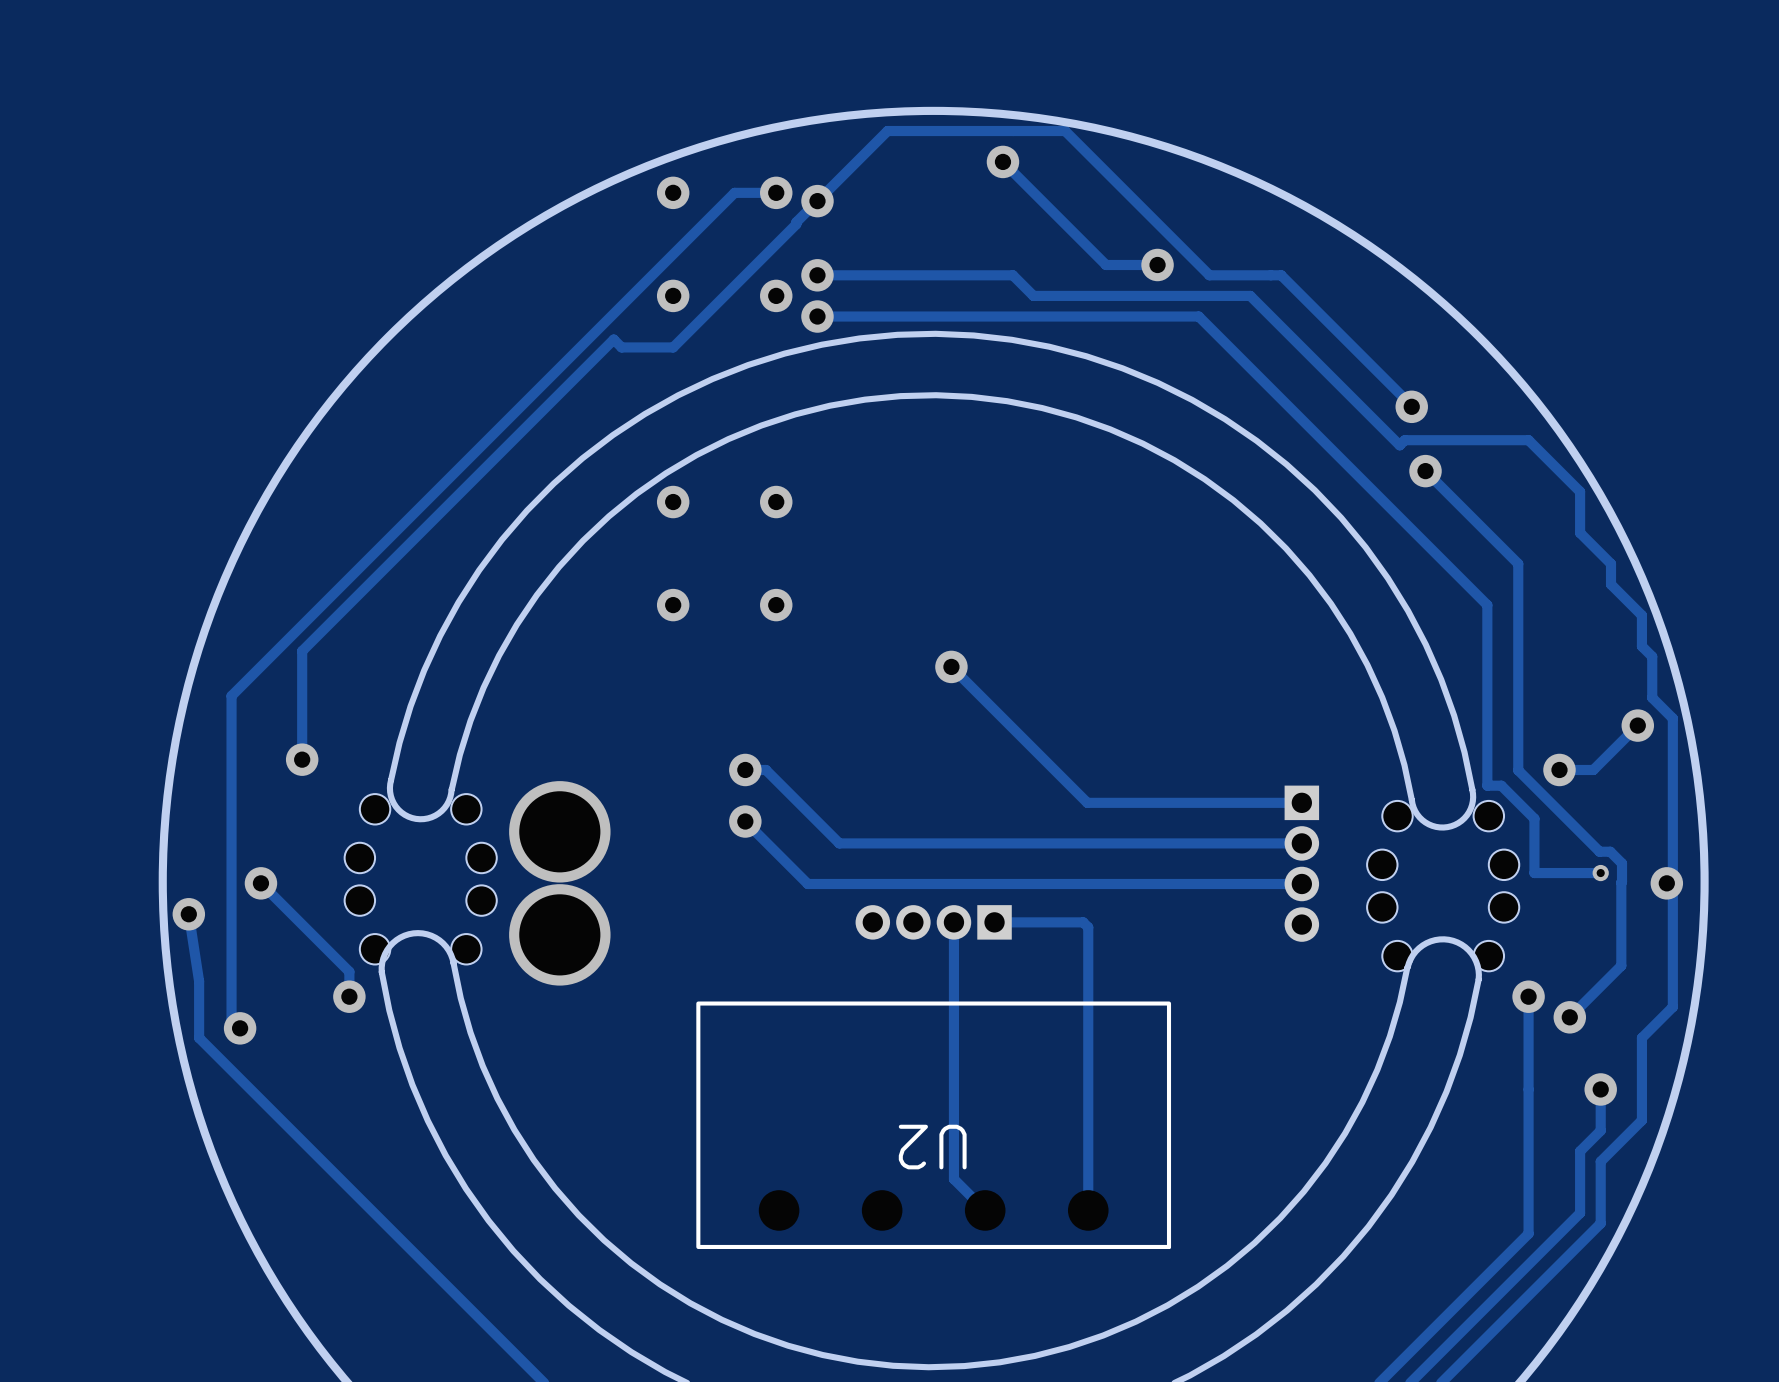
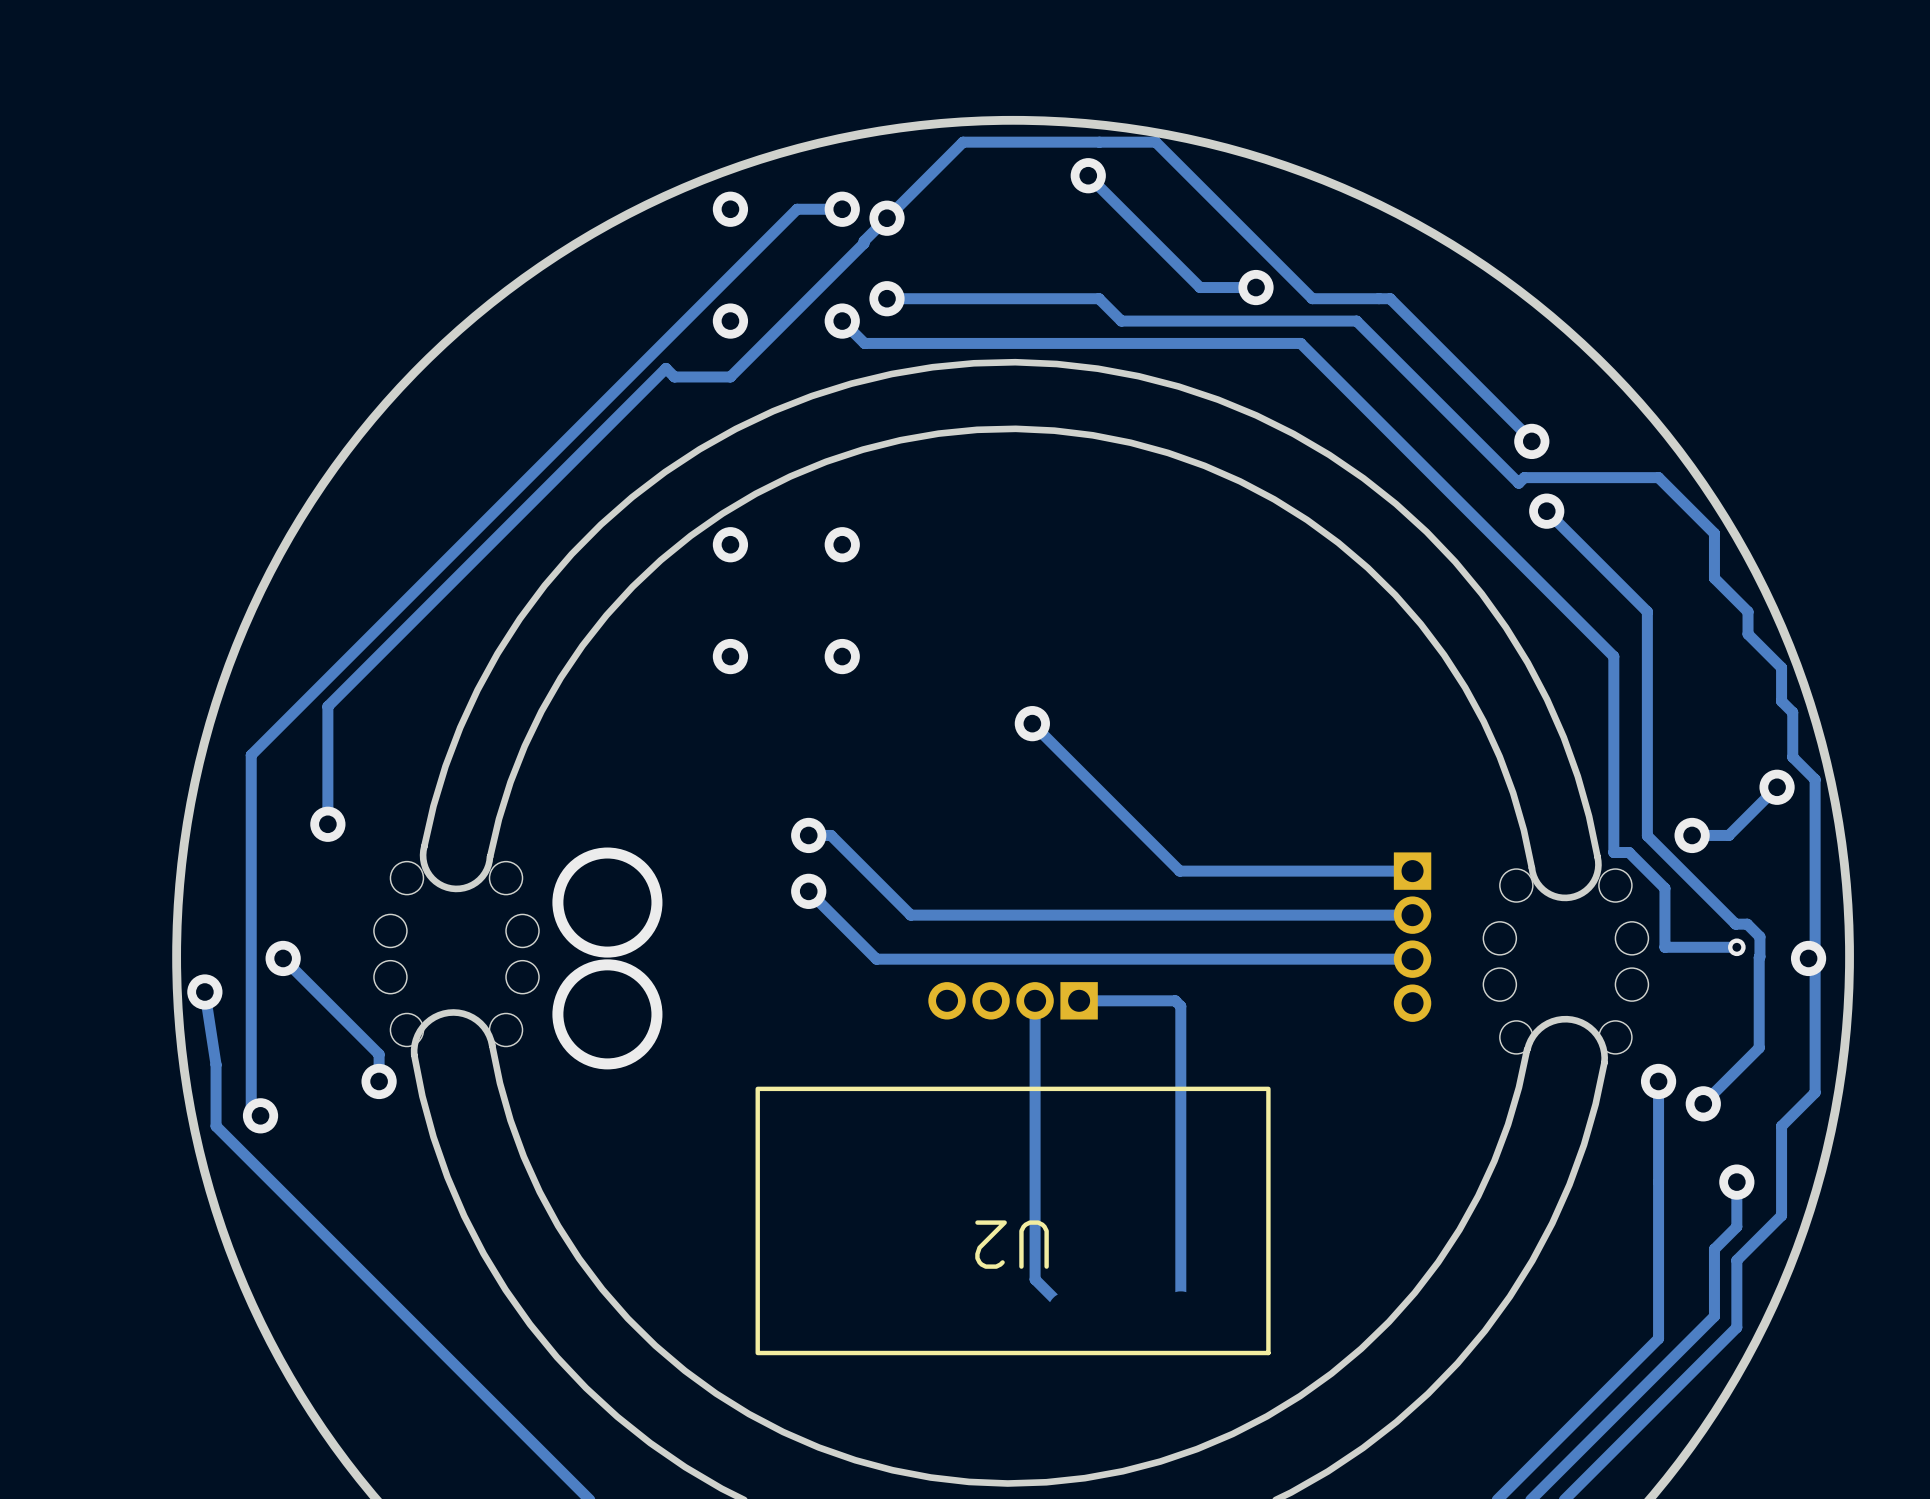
track: none -> (842, 321) (864, 343) (886, 343)
via: (817, 316) -> none

